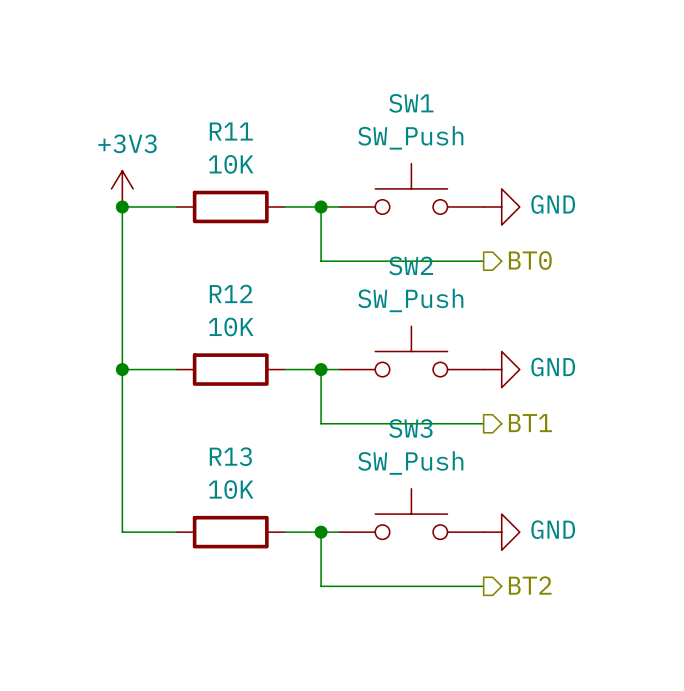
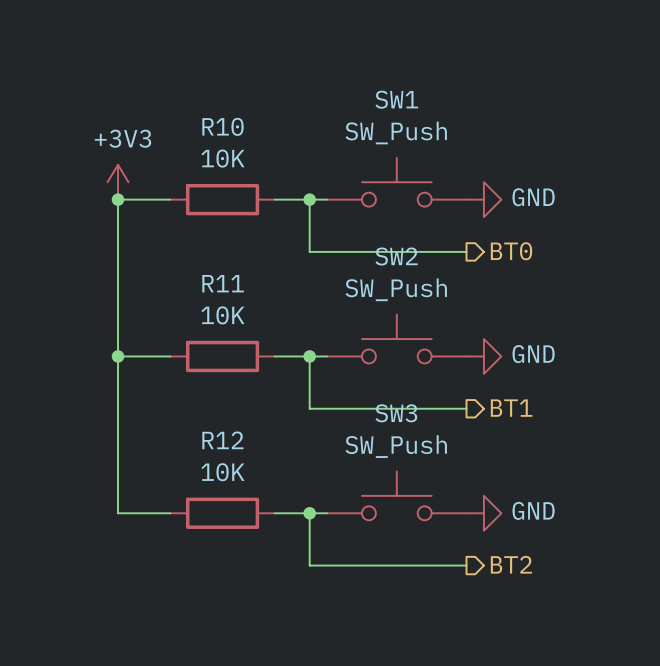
R11 name: R11 (231, 131) -> R10 (222, 126)
R12 name: R12 (231, 293) -> R11 (223, 283)
R13 name: R13 (230, 456) -> R12 (222, 440)

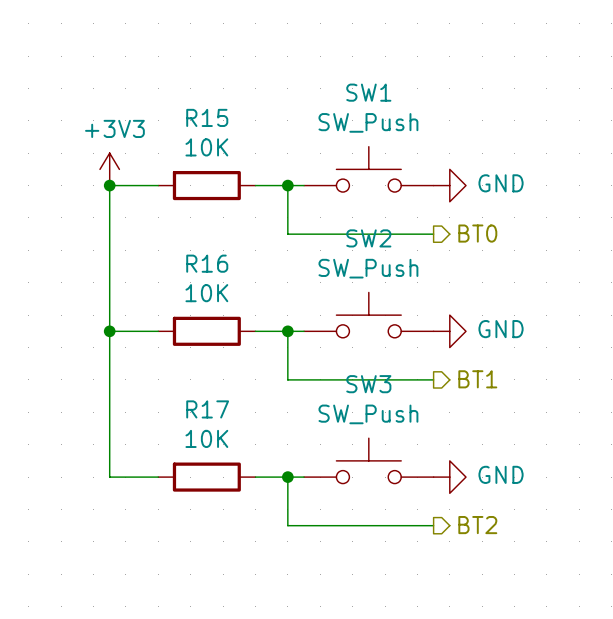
R10 name: R10 (222, 126) -> R15 (207, 117)
R11 name: R11 (223, 283) -> R16 (207, 263)
R12 name: R12 (222, 440) -> R17 (207, 409)

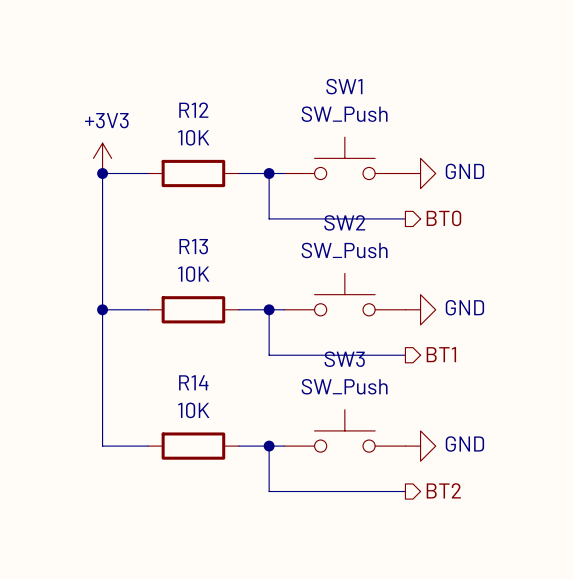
R15 name: R15 (207, 117) -> R12 (193, 110)
R16 name: R16 (207, 263) -> R13 (193, 246)
R17 name: R17 (207, 409) -> R14 (193, 382)

